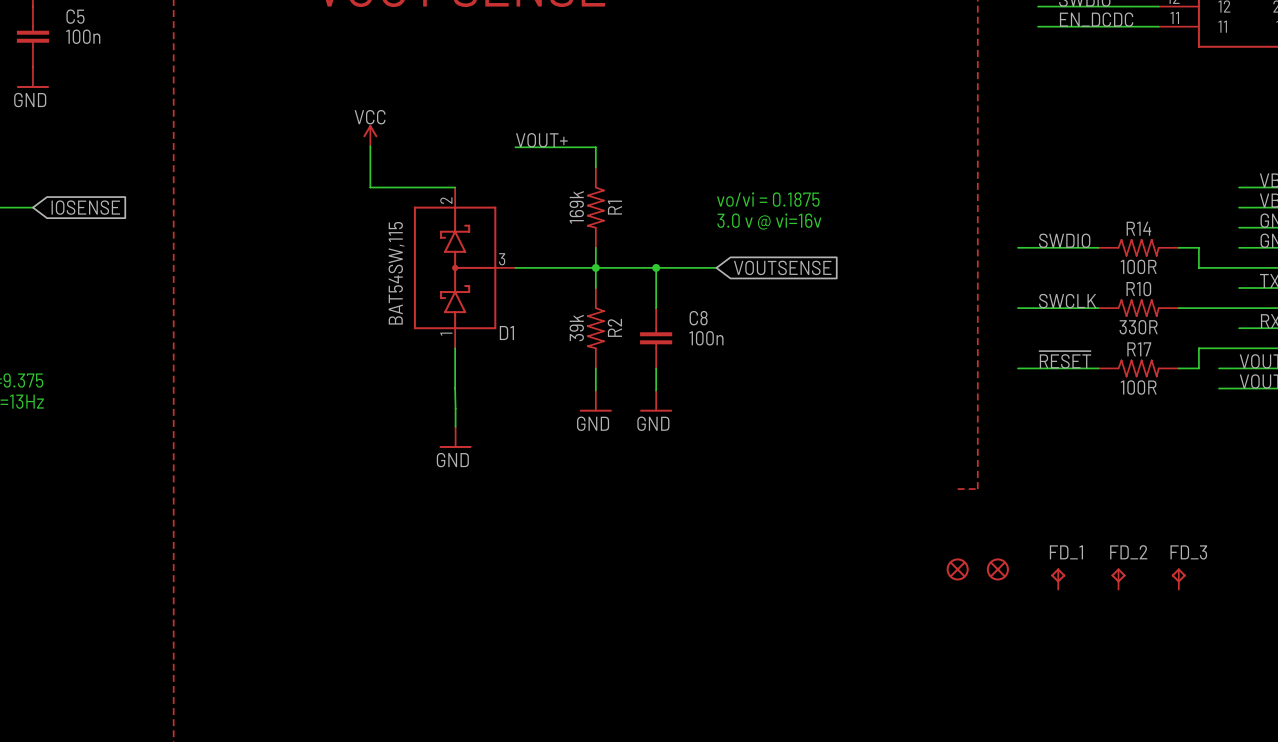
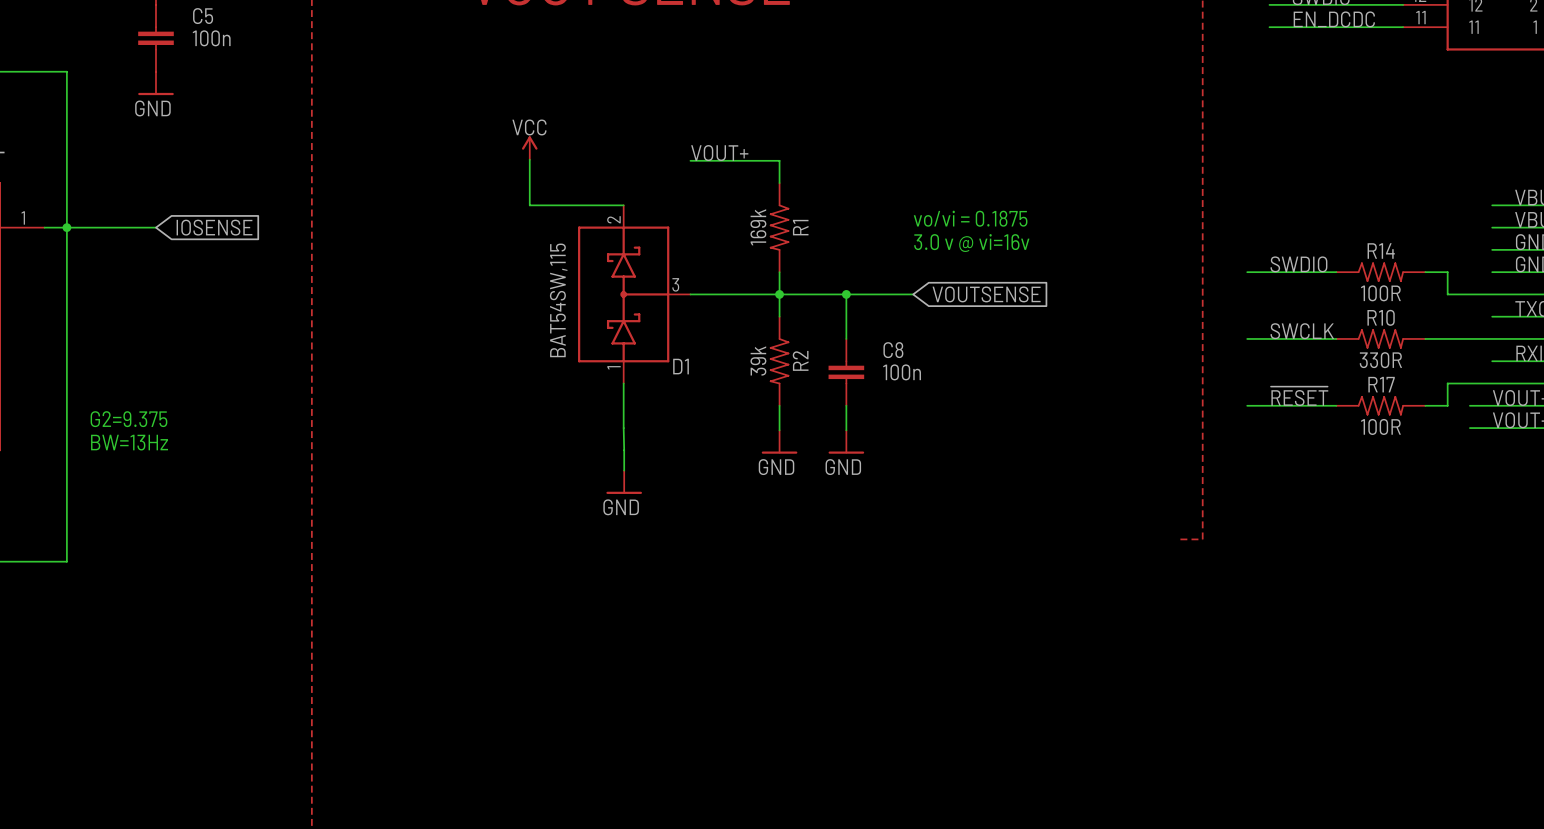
part: (957, 569) -> none
part: (997, 569) -> none
FD_1: (1058, 579) -> none
FD_2: (1118, 579) -> none
FD_3: (1178, 579) -> none

